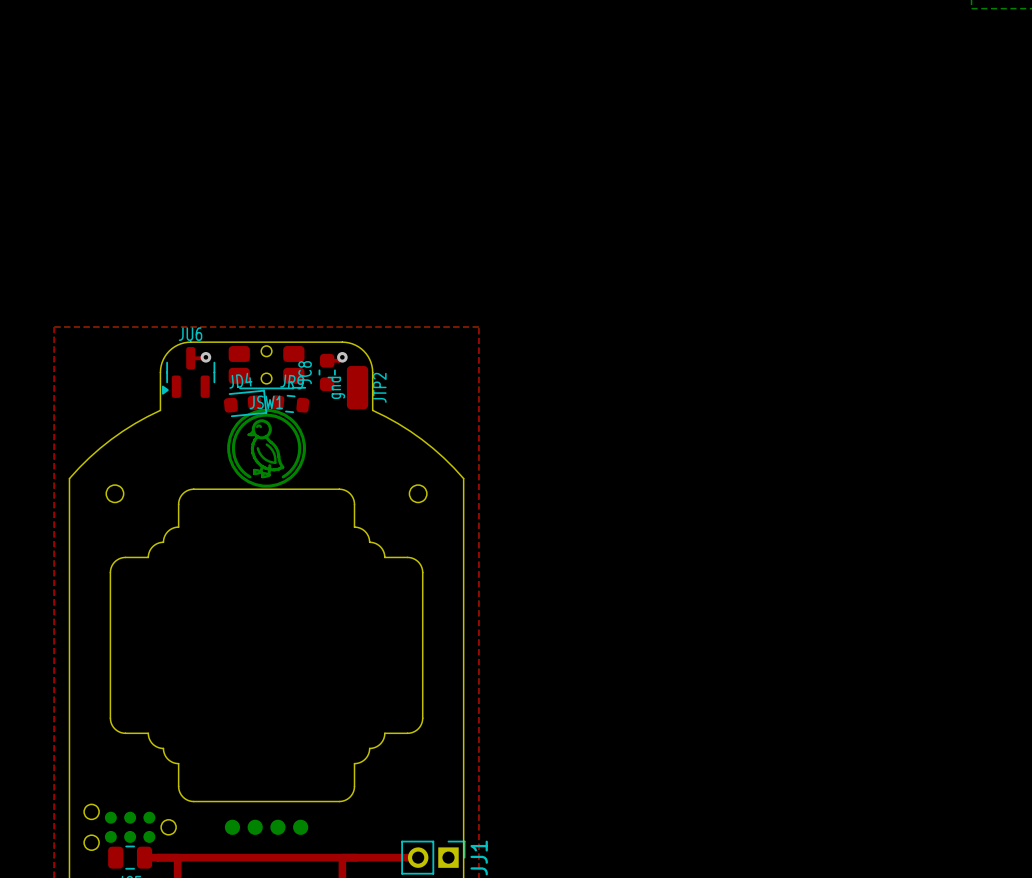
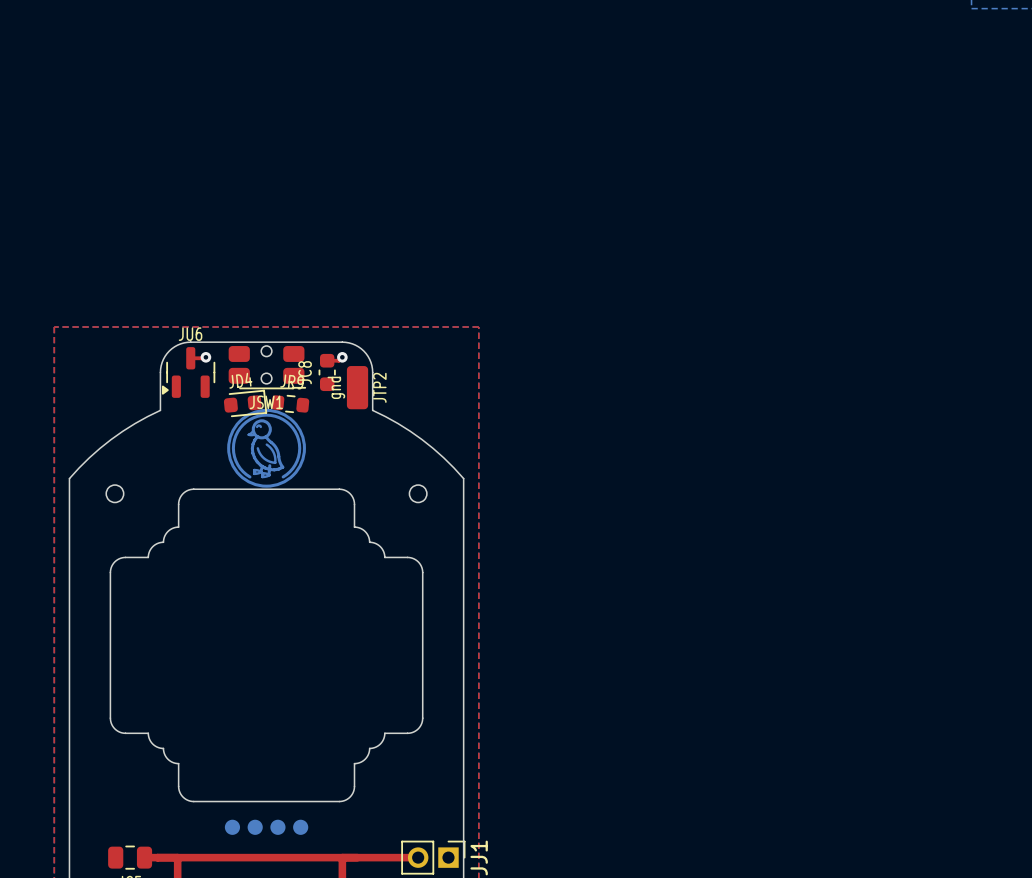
part: (130, 827) -> none

